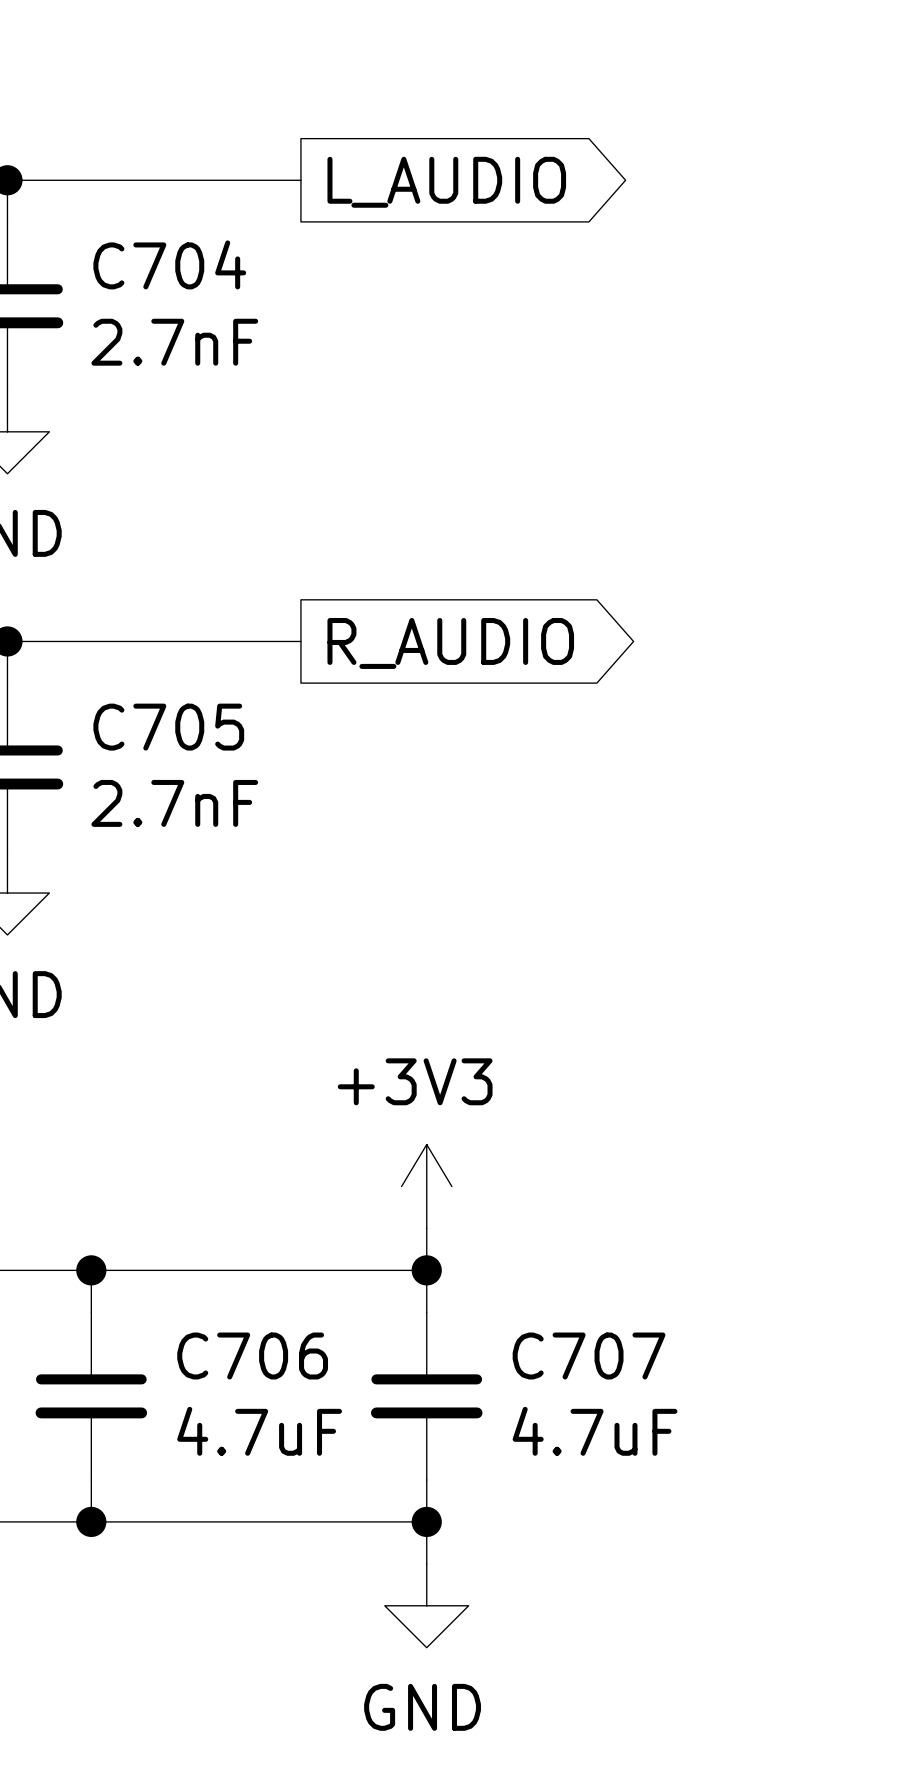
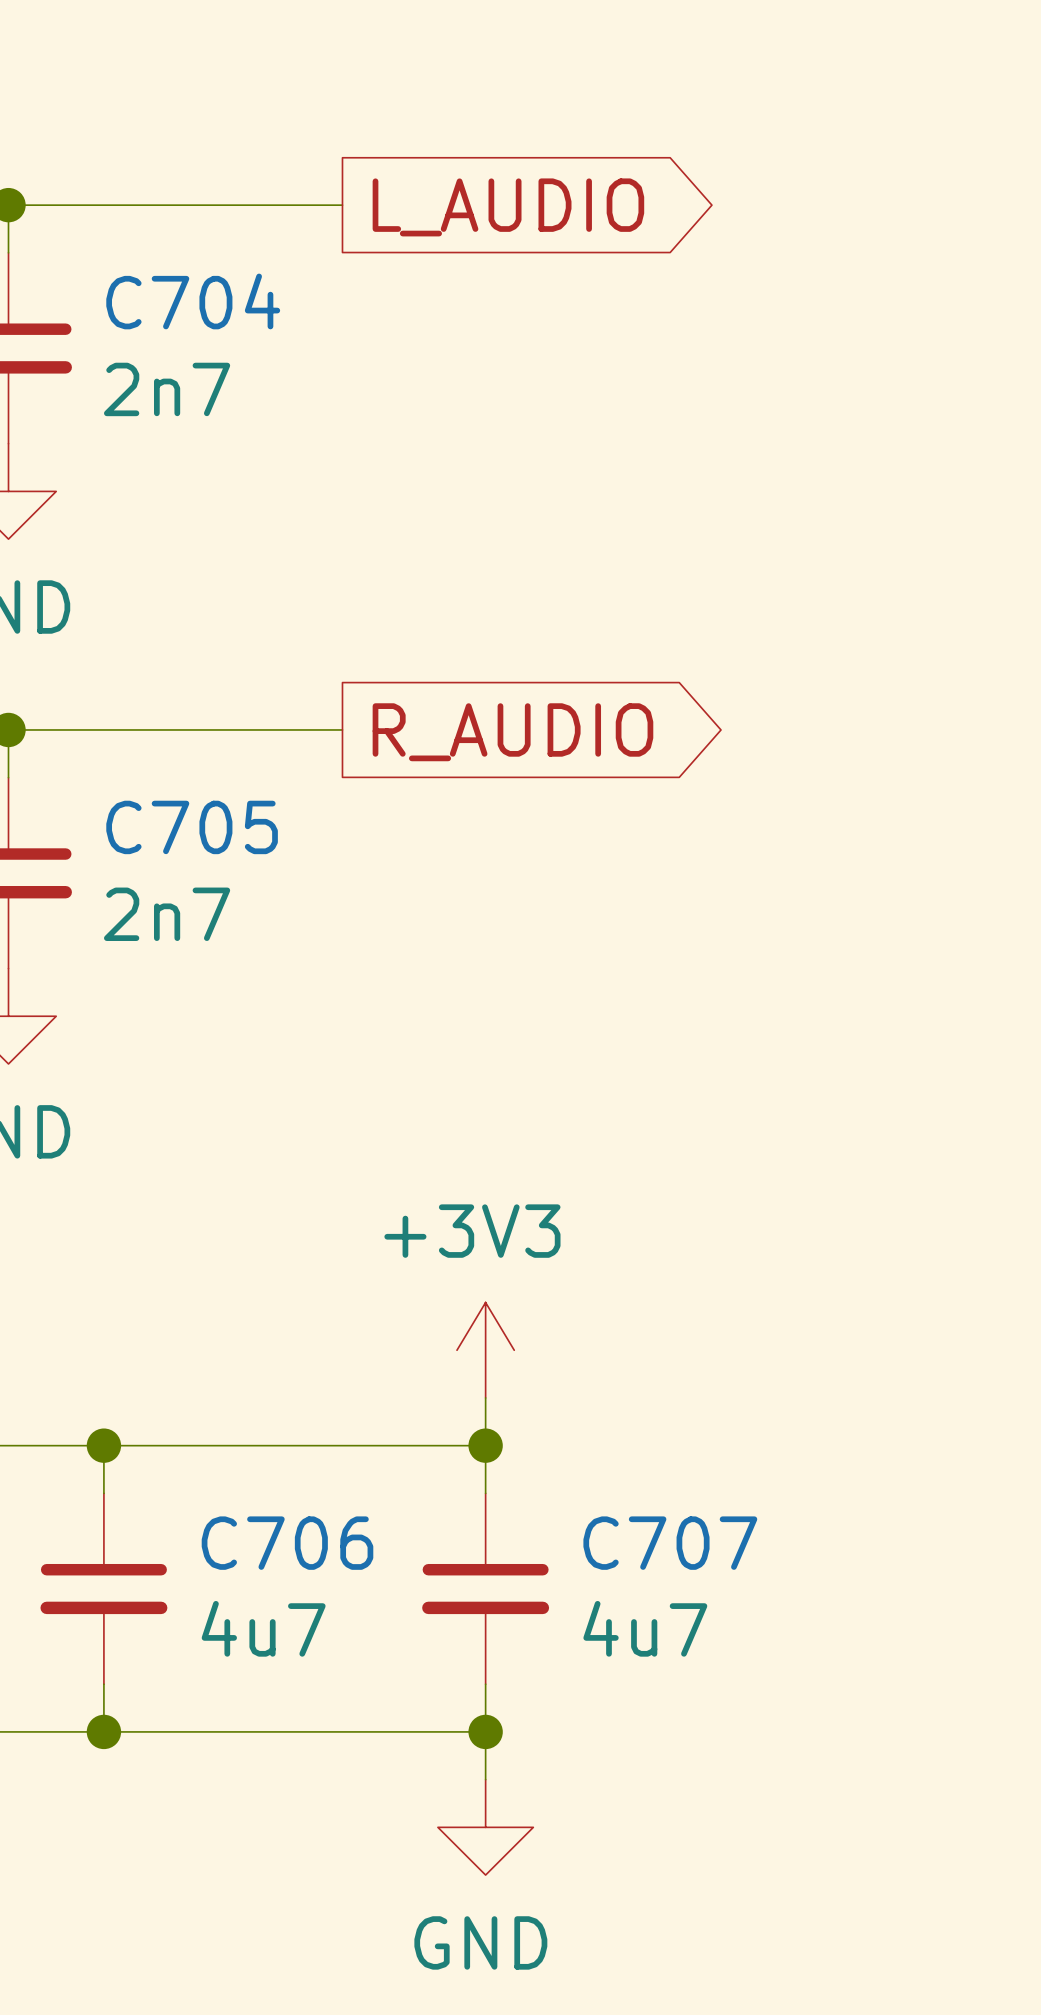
C704 value: 2.7nF (174, 342) -> 2n7 (167, 389)
C705 value: 2.7nF (174, 803) -> 2n7 (167, 914)
C706 value: 4.7uF (259, 1431) -> 4u7 (263, 1628)
C707 value: 4.7uF (595, 1431) -> 4u7 (645, 1628)

